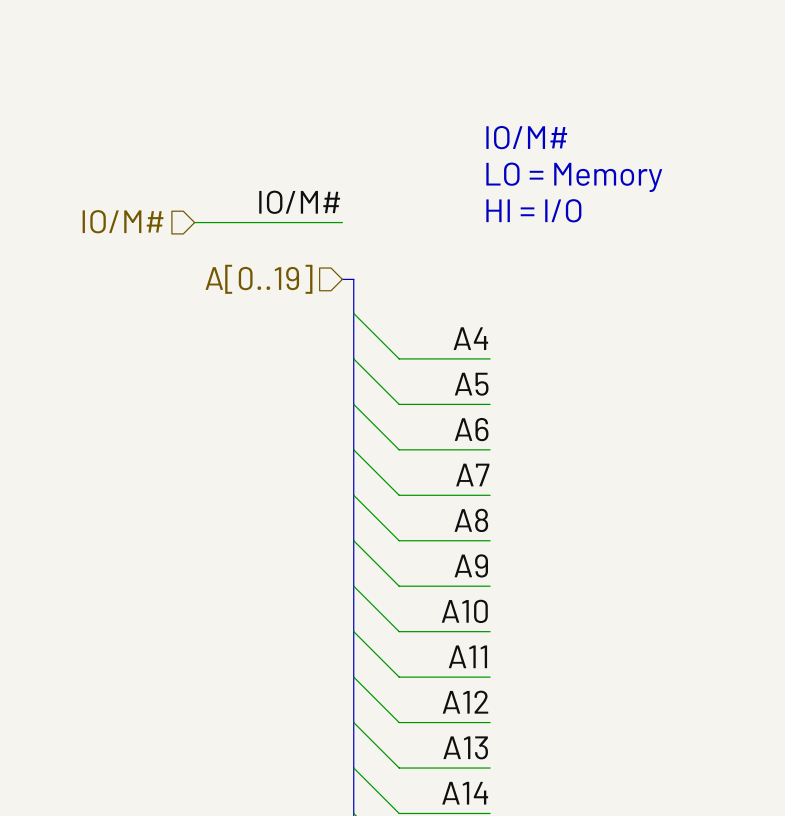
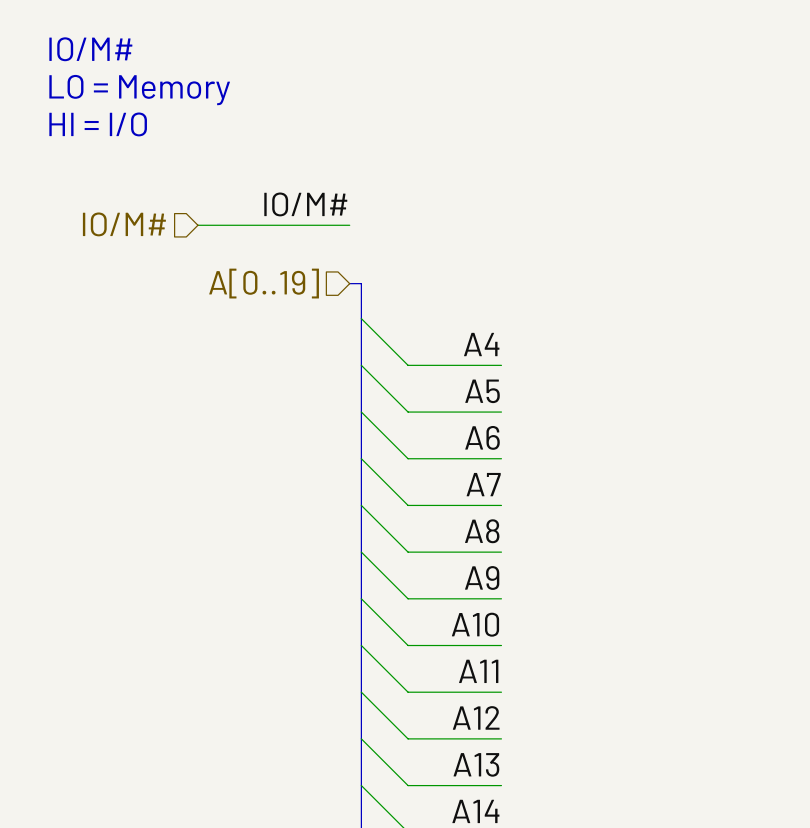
text position: IO/M# (526, 137) -> IO/M# (90, 49)
text position: LO = Memory (574, 177) -> LO = Memory (139, 90)
text position: HI = I/O (533, 210) -> HI = I/O (98, 124)

